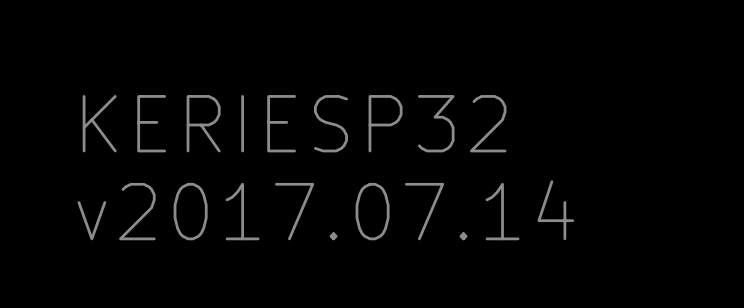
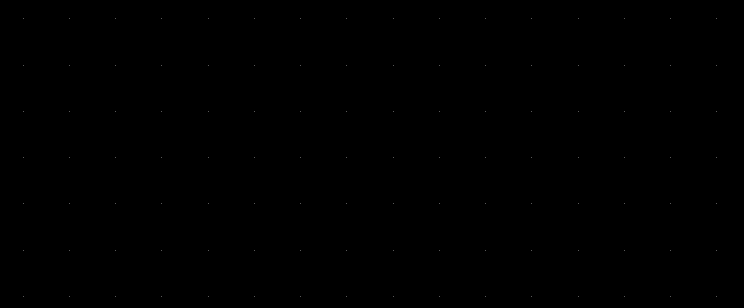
text: KERIESP32 (294, 123) -> none
text: v2017.07.14 (325, 210) -> none

